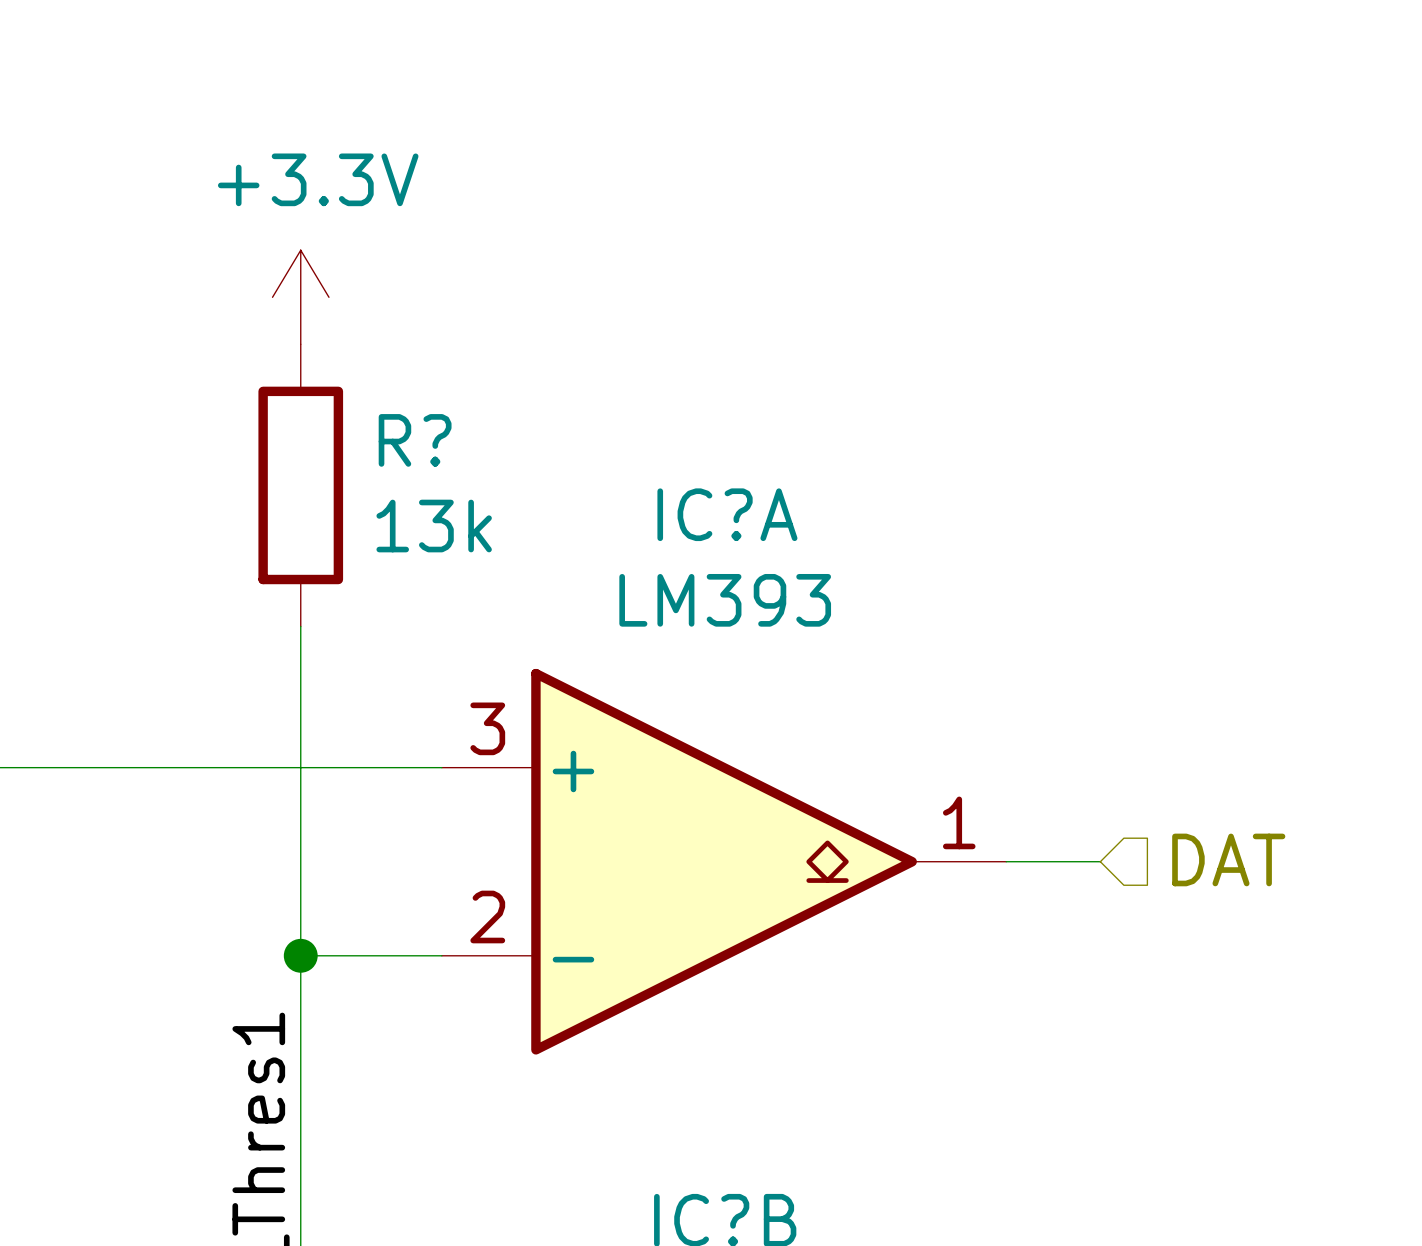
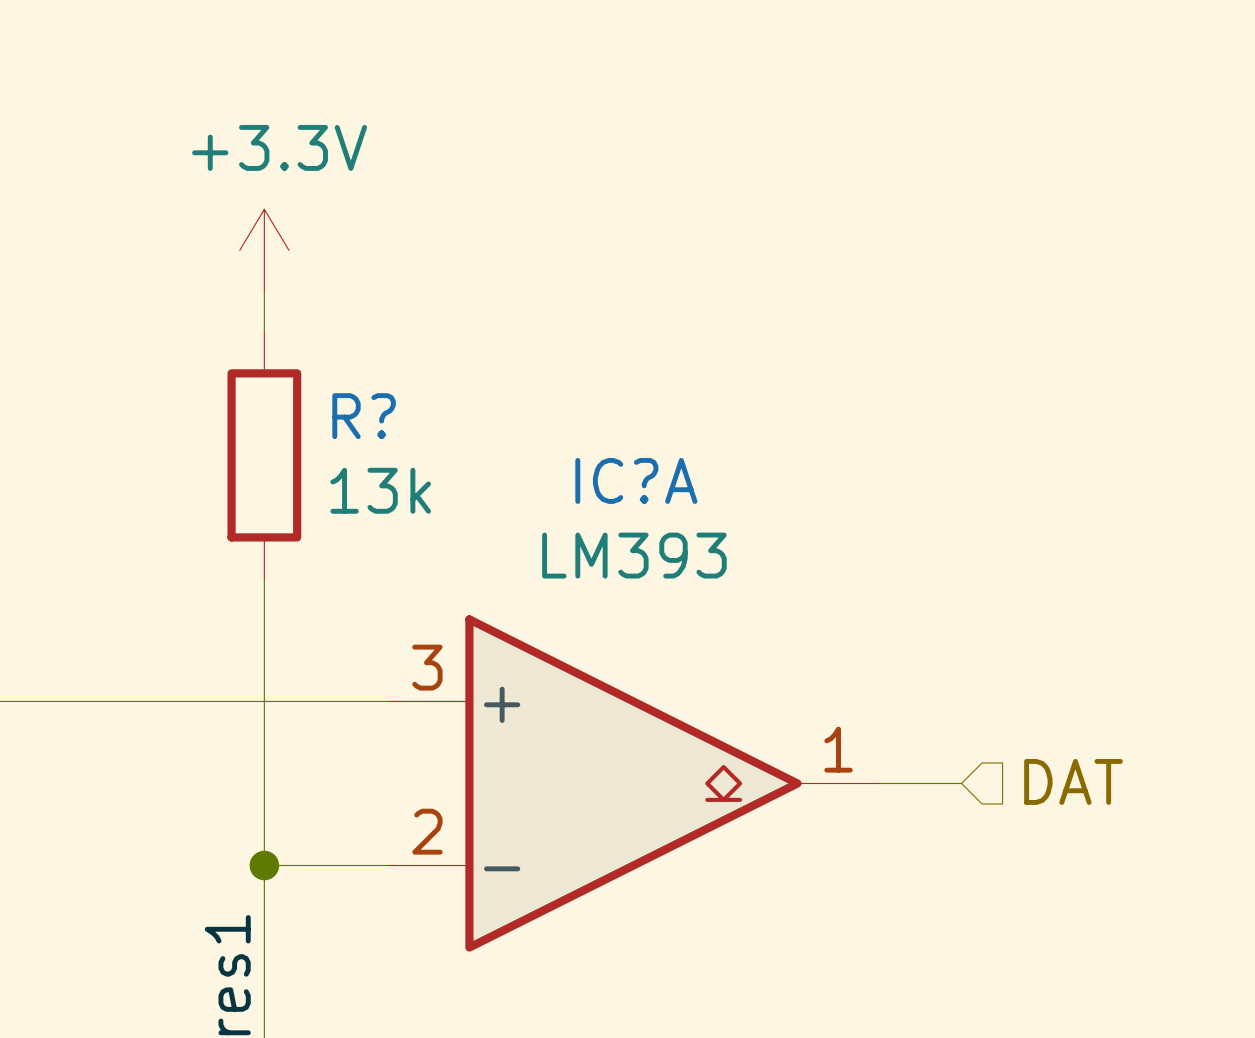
power symbol position: +3.3V (300, 297) -> +3.3V (264, 250)

